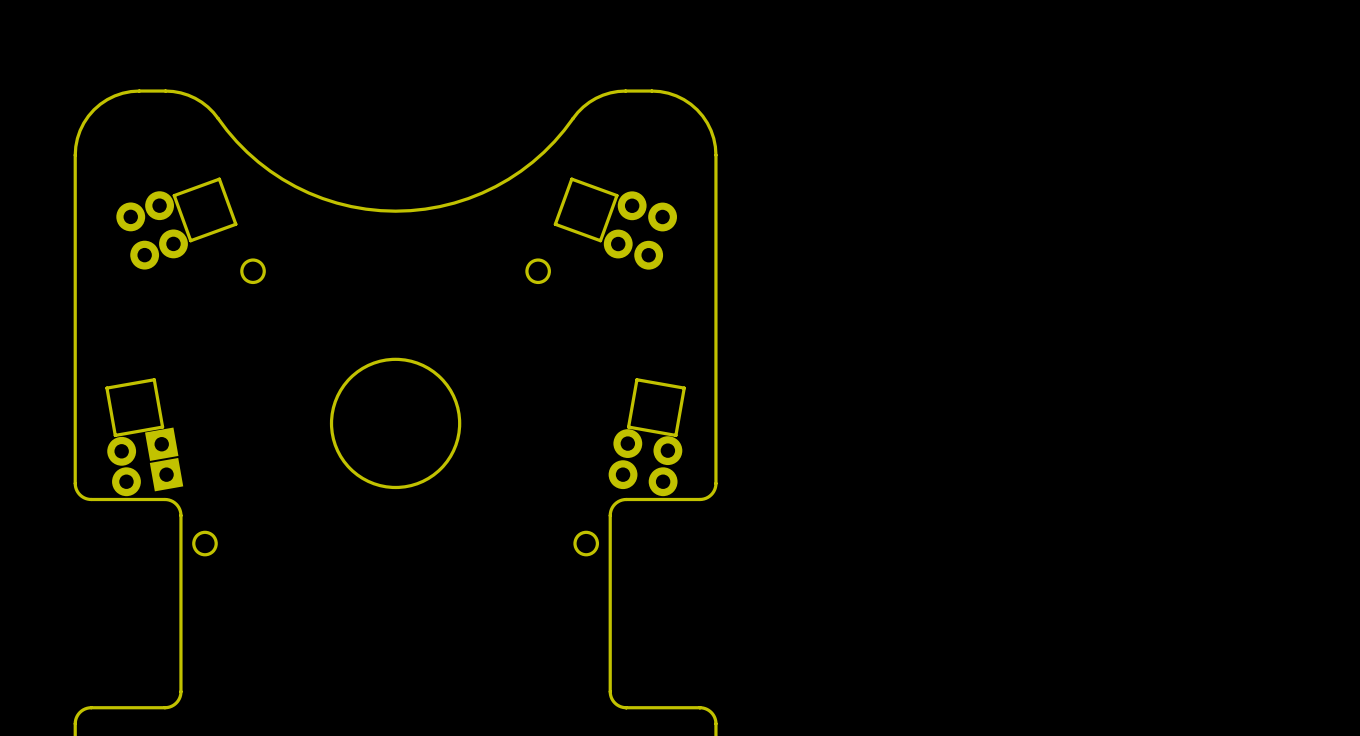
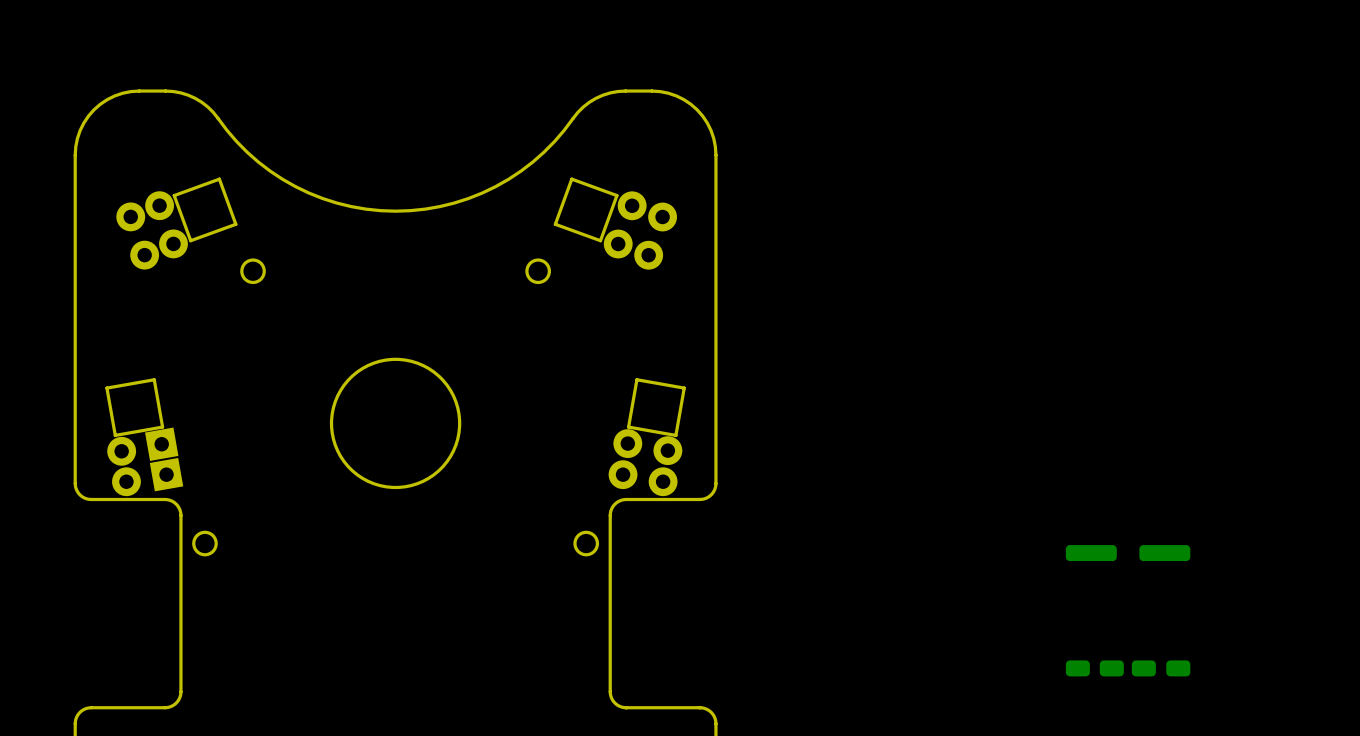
part: none -> (1128, 553)
part: none -> (1128, 668)

